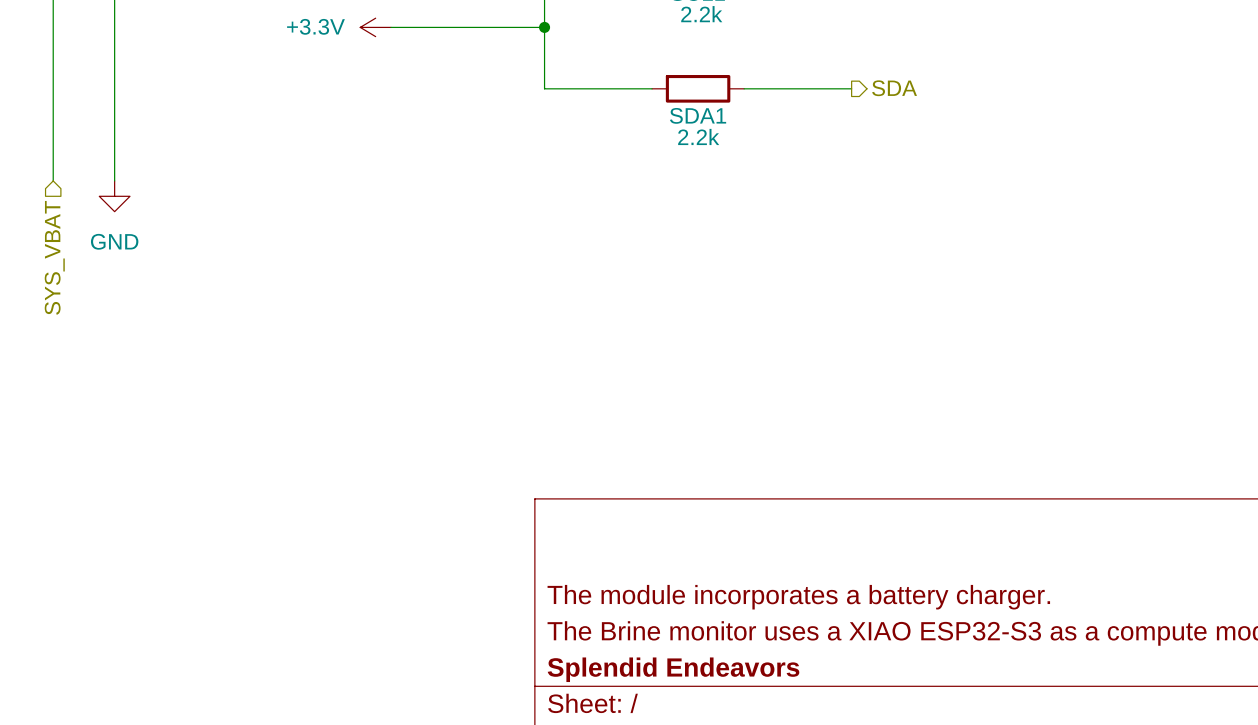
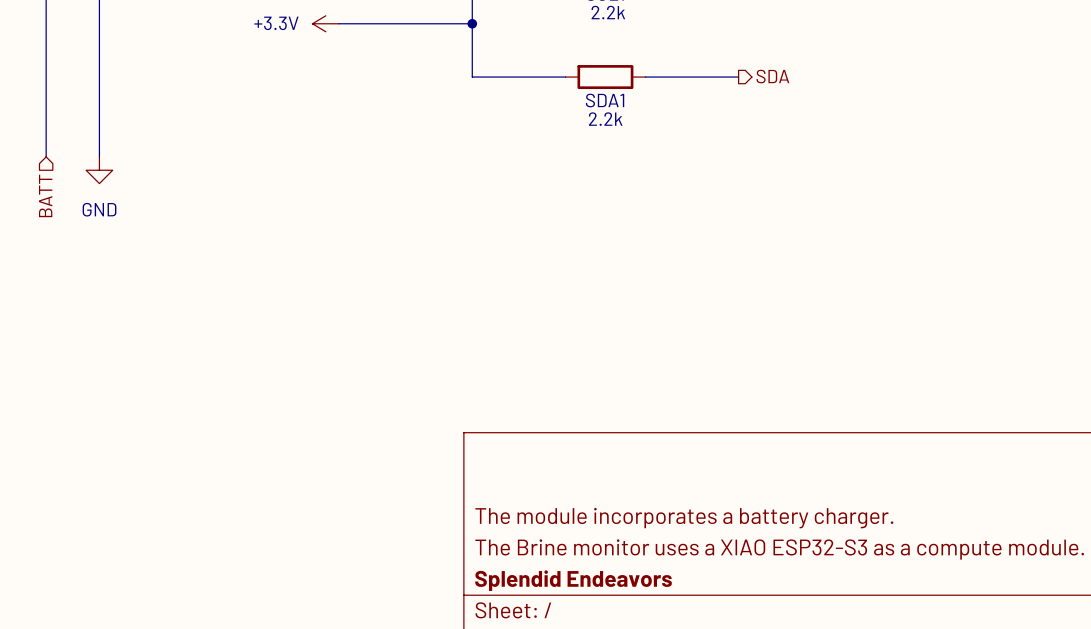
hierarchical label: SYS_VBAT (54, 257) -> BATT (45, 195)

